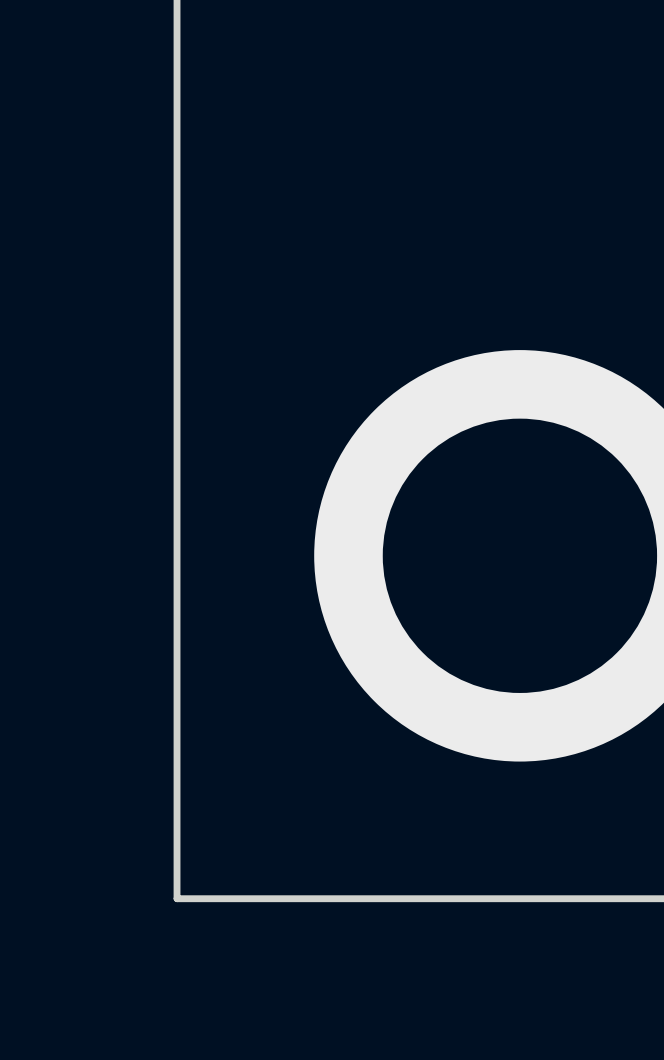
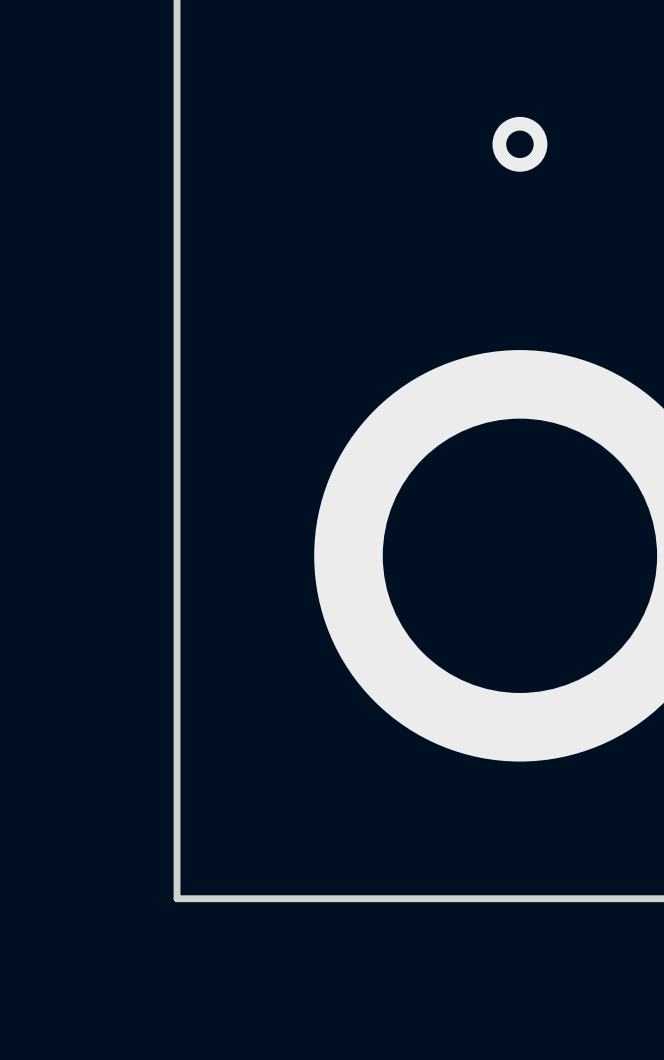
via: none -> (519, 144)

